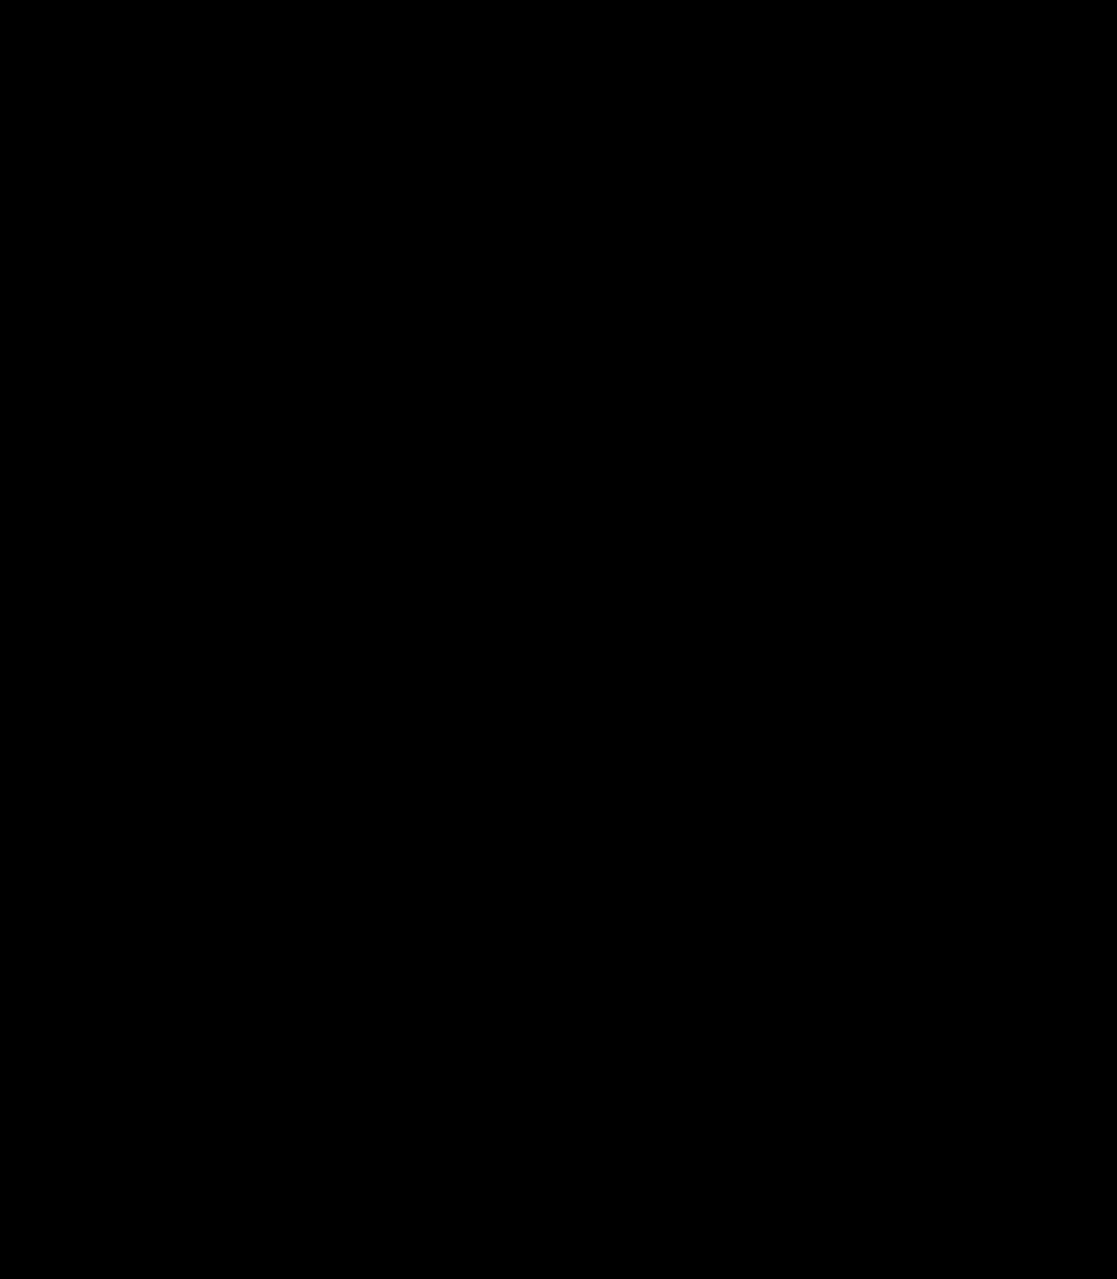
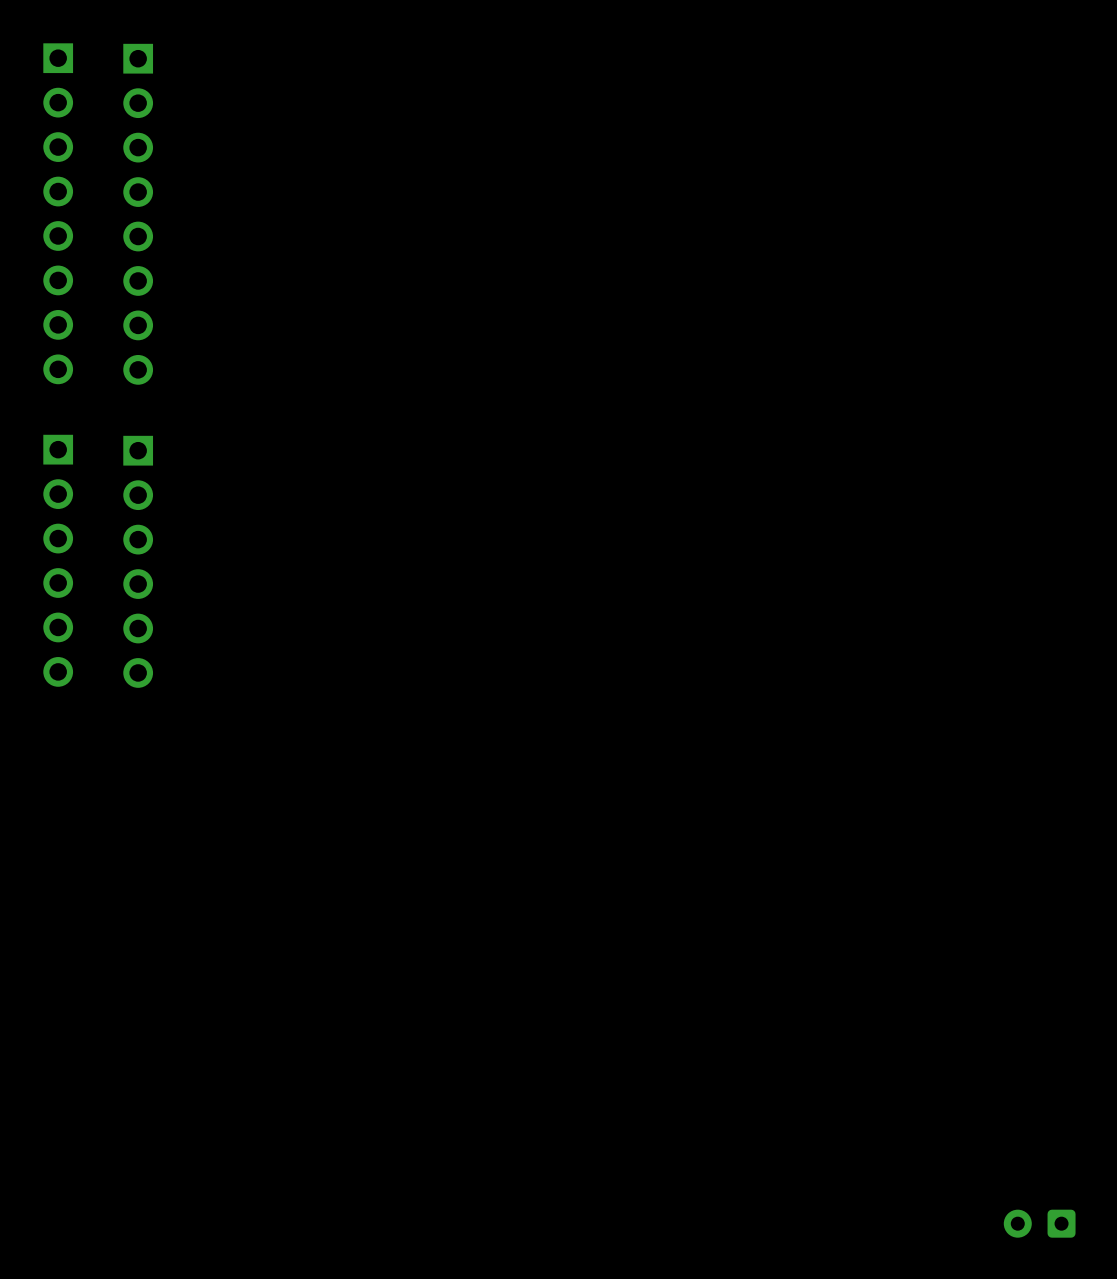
part: none -> (58, 213)
part: none -> (138, 214)
part: none -> (58, 560)
part: none -> (138, 561)
part: none -> (1039, 1223)

